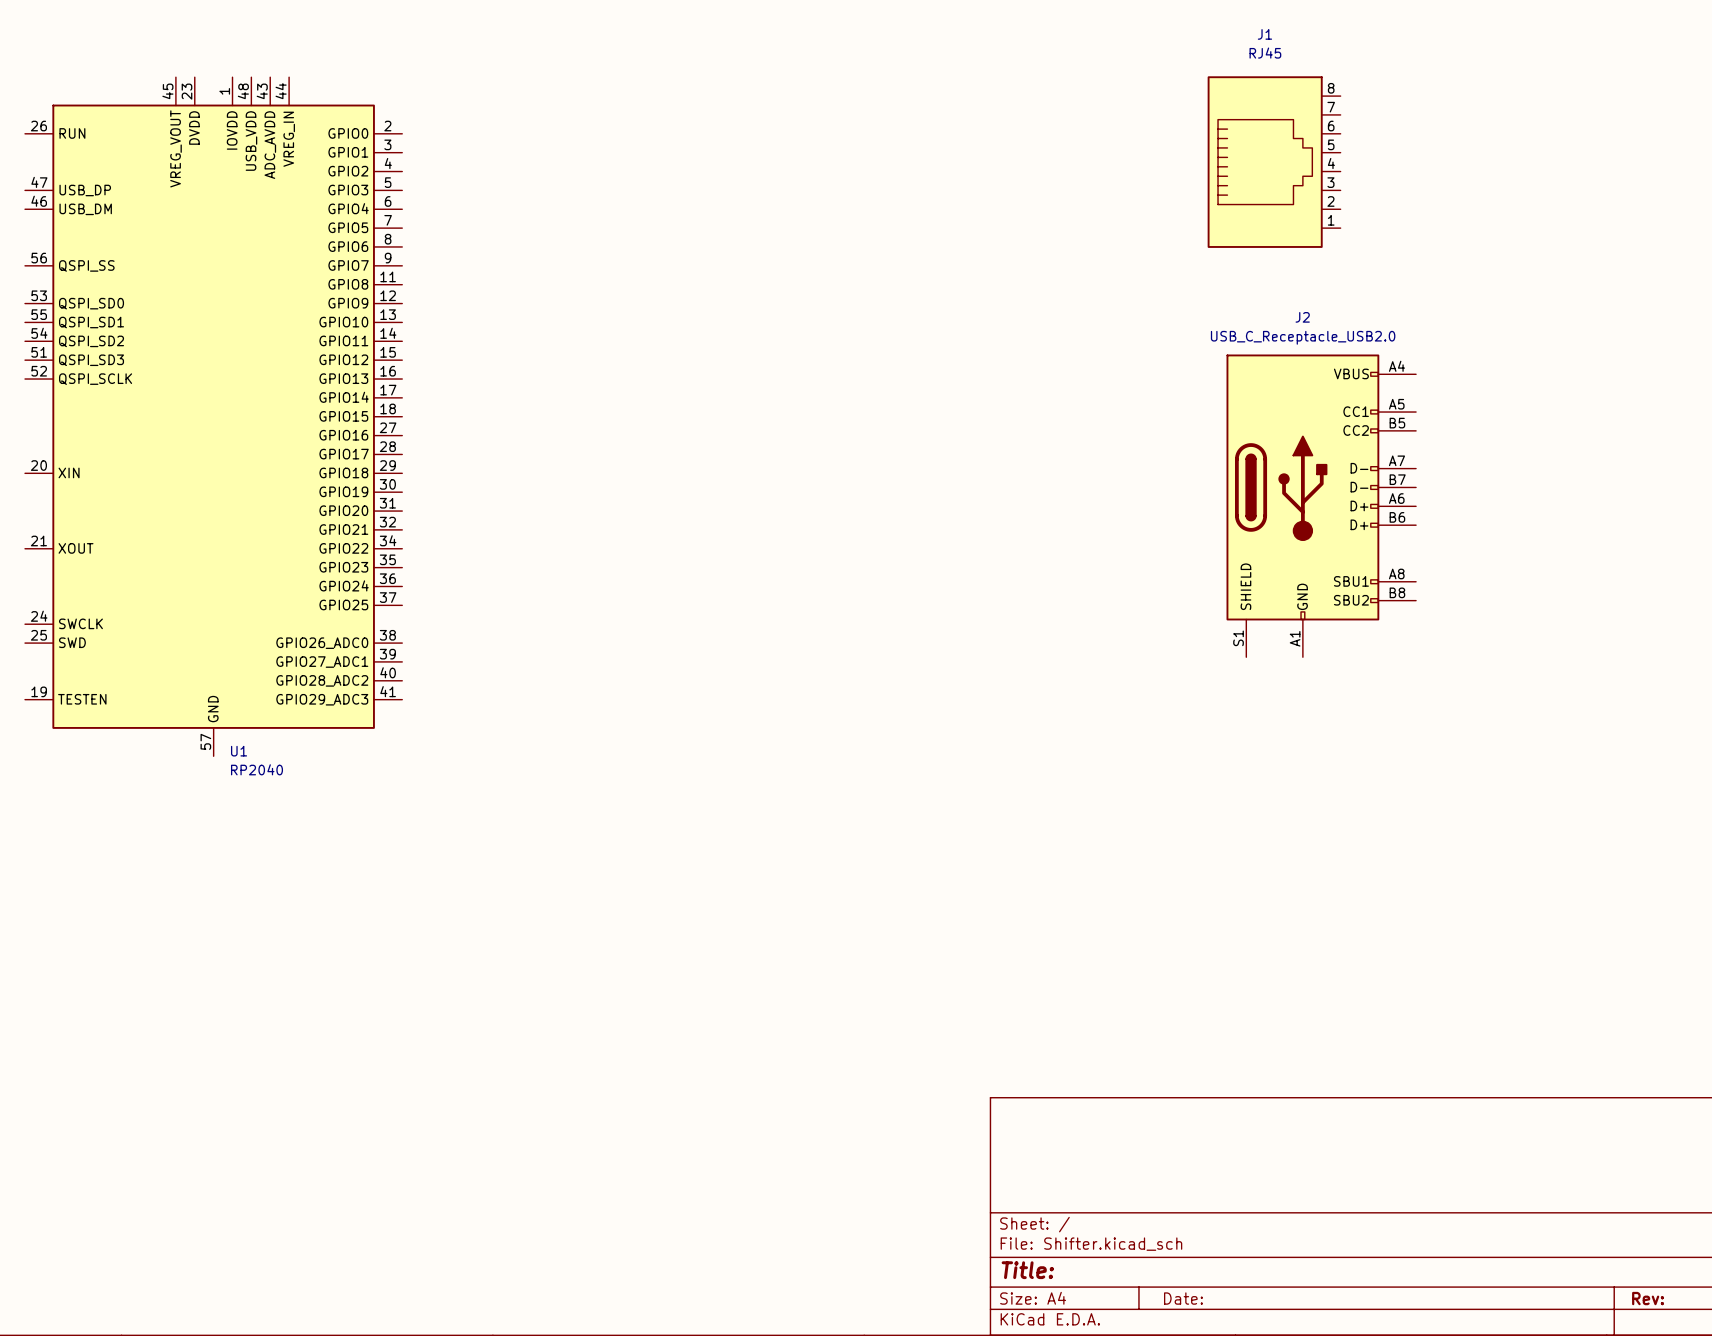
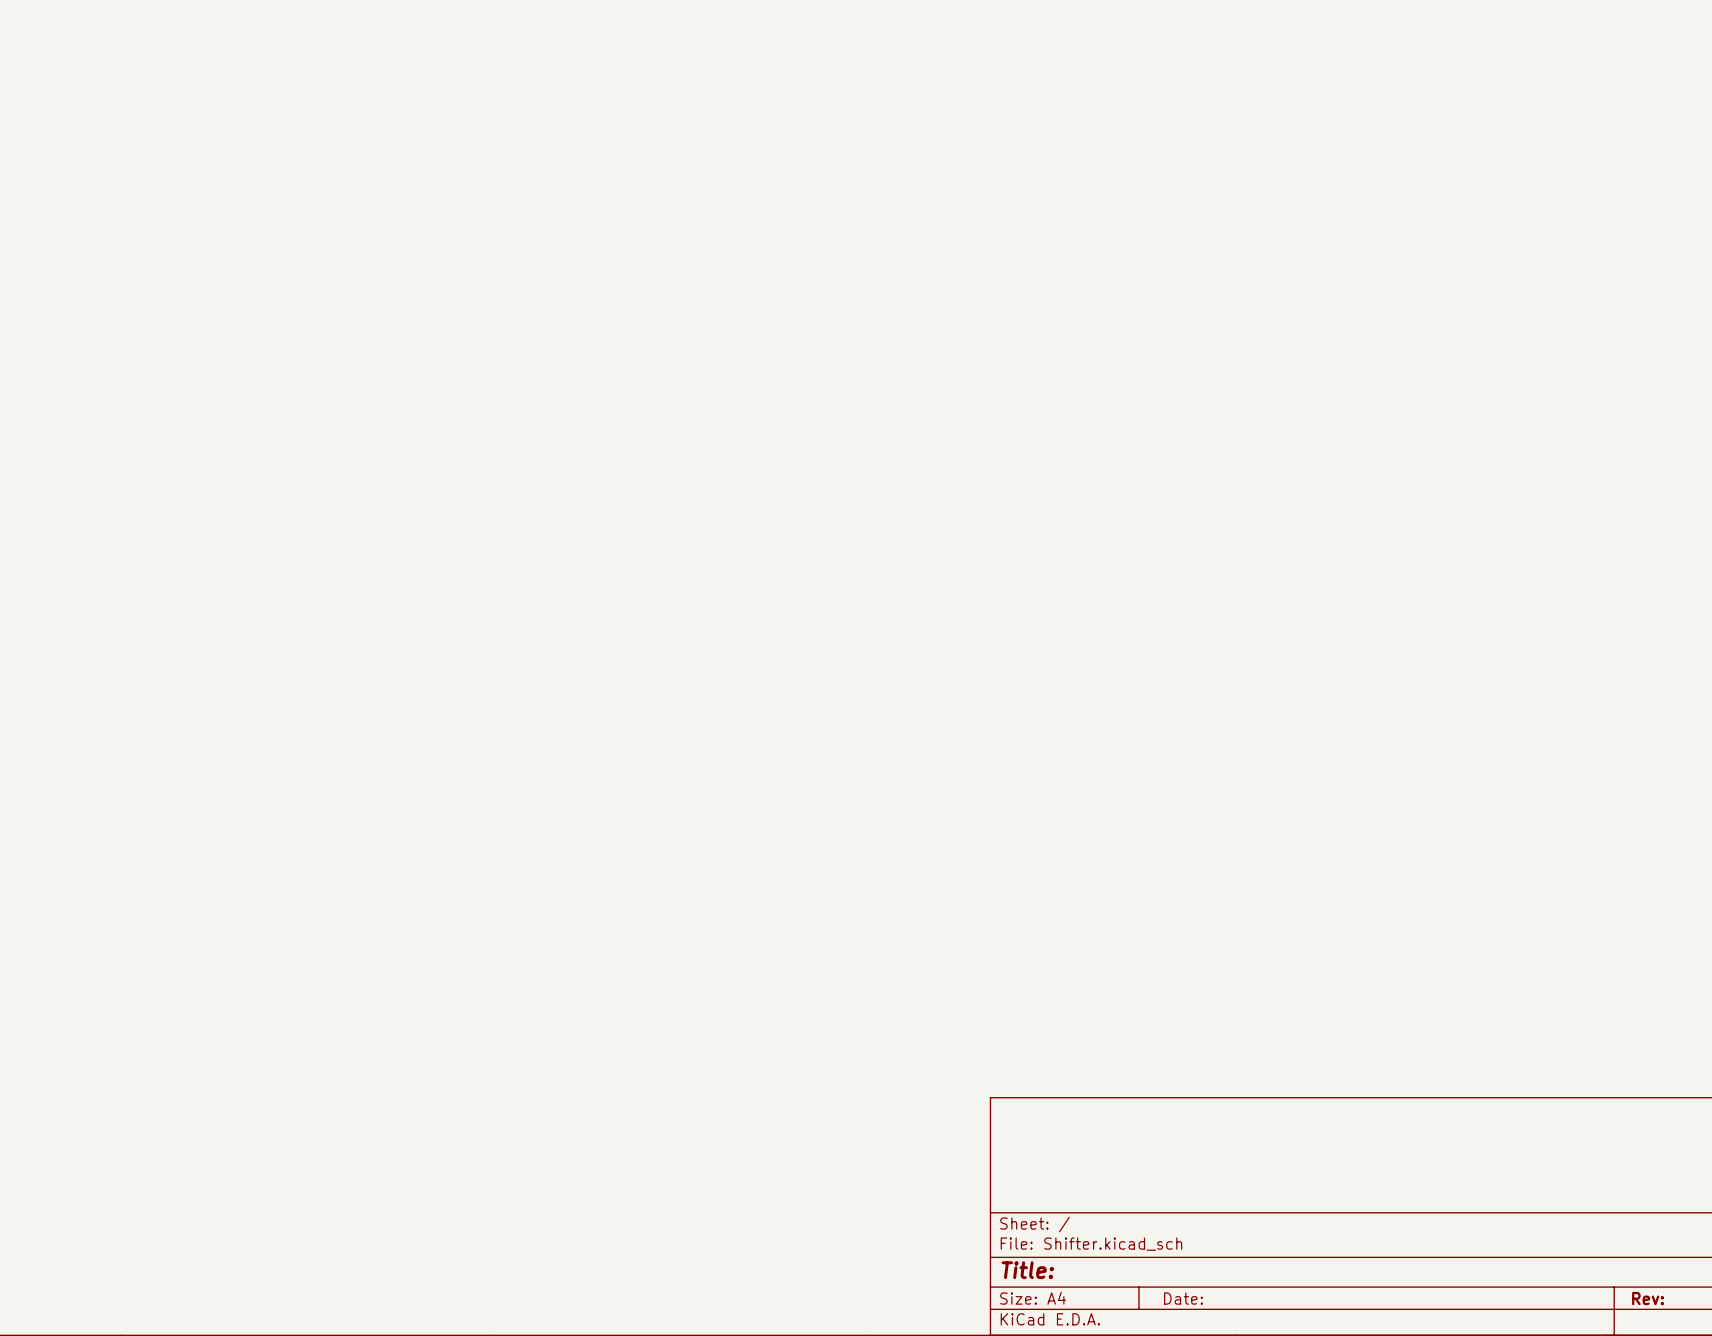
J1: RJ45 (1274, 162) -> none
U1: RP2040 (213, 416) -> none
J2: USB_C_Receptacle_USB2.0 (1321, 505) -> none

